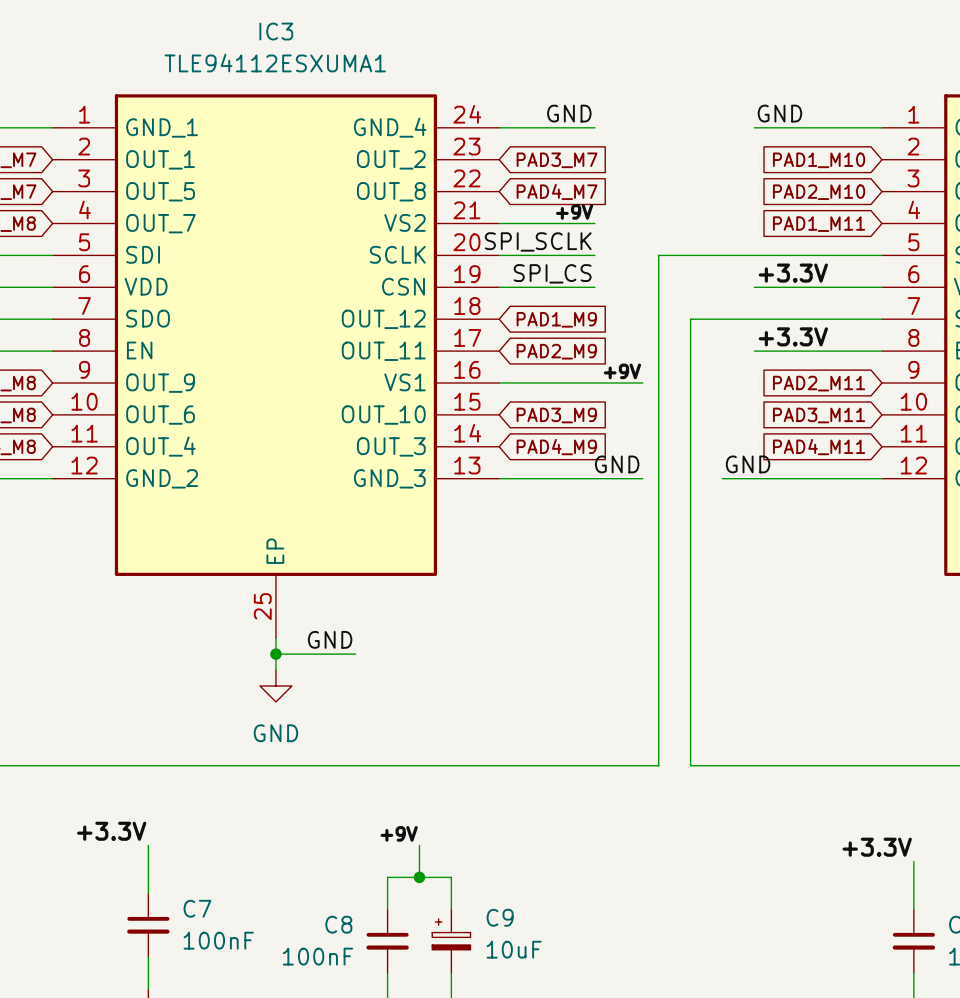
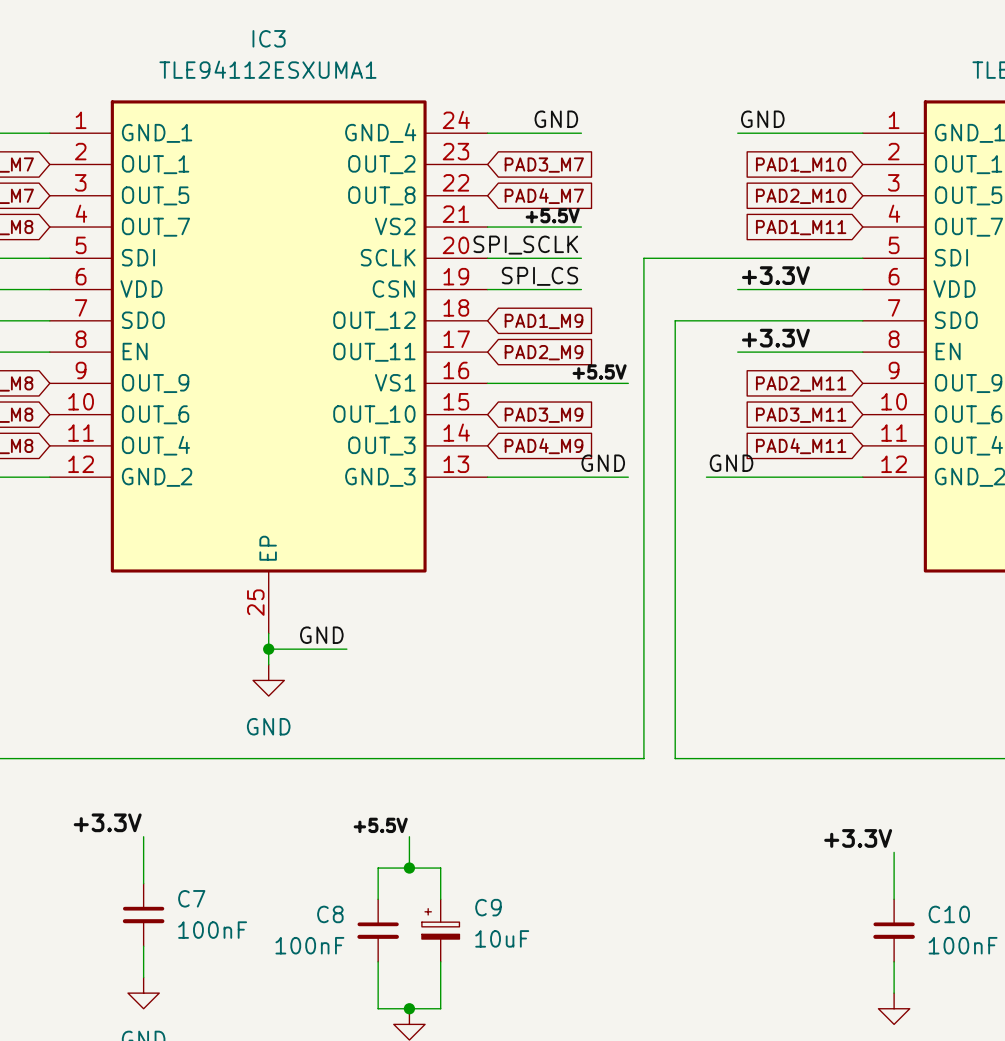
label: +9V (574, 211) -> +5.5V (552, 215)
label: +9V (622, 371) -> +5.5V (599, 371)
label: +9V (399, 833) -> +5.5V (380, 825)

